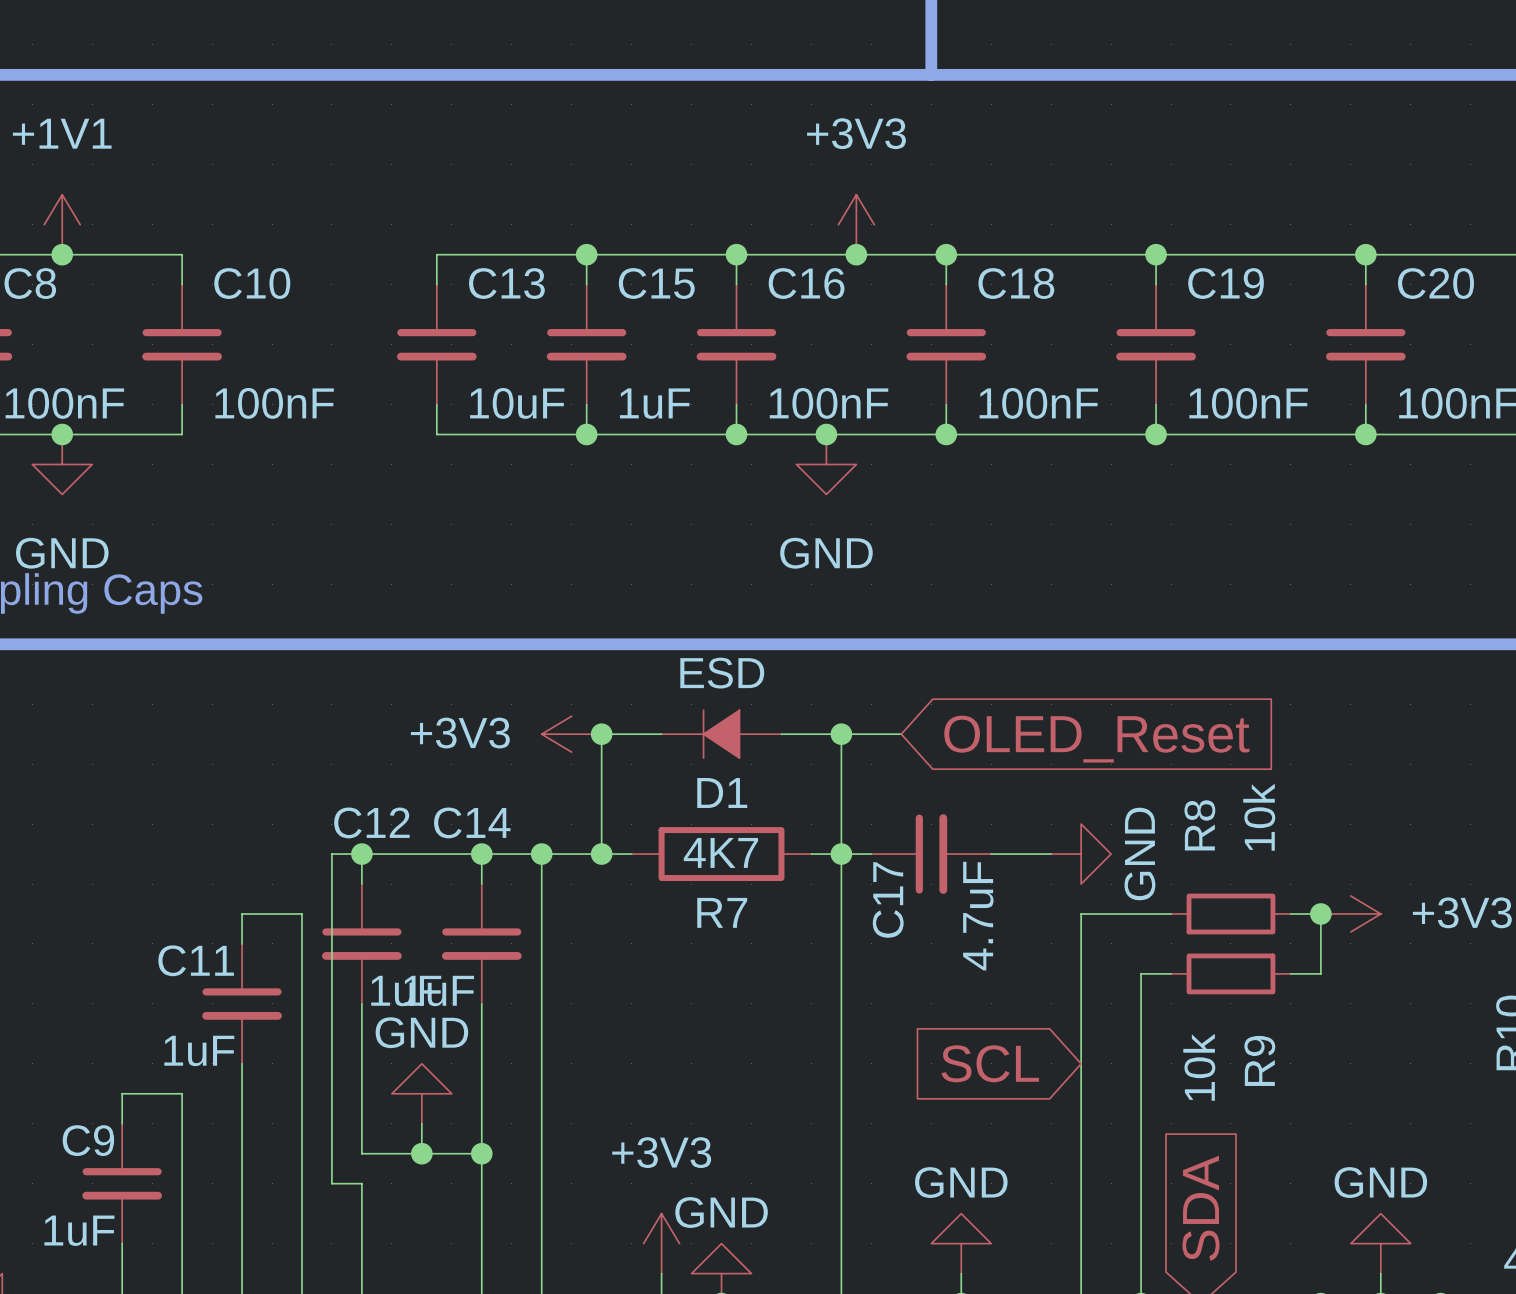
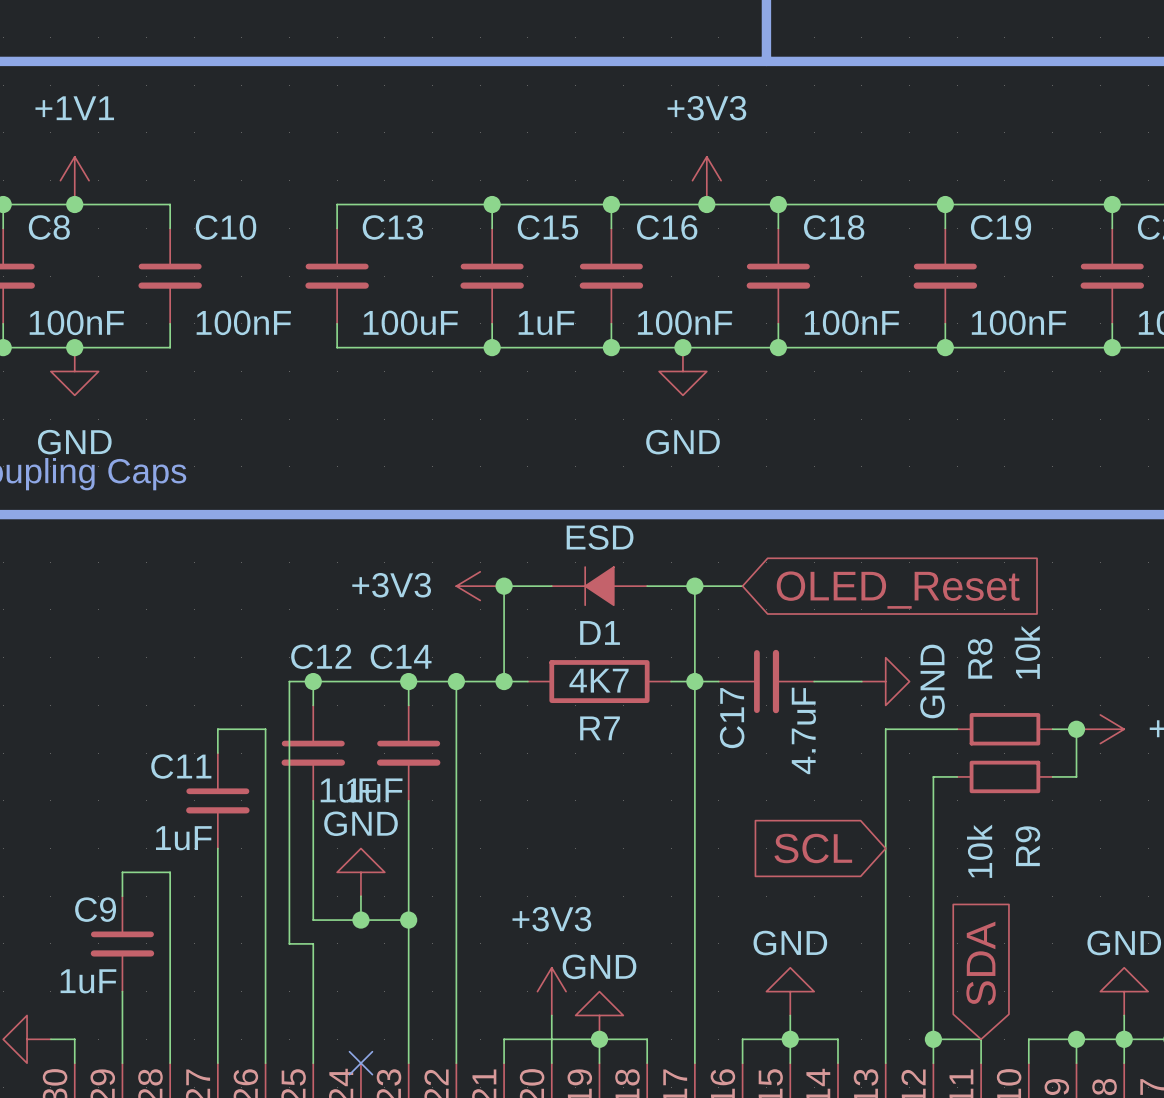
wire: (436, 254) (436, 284) -> (372, 204) (337, 204) (337, 228)
C13 position: (436, 344) -> (337, 276)
C13 value: 10uF (517, 403) -> 100uF (410, 322)
wire: (436, 404) (436, 434) -> (337, 323) (337, 347) (372, 347)

